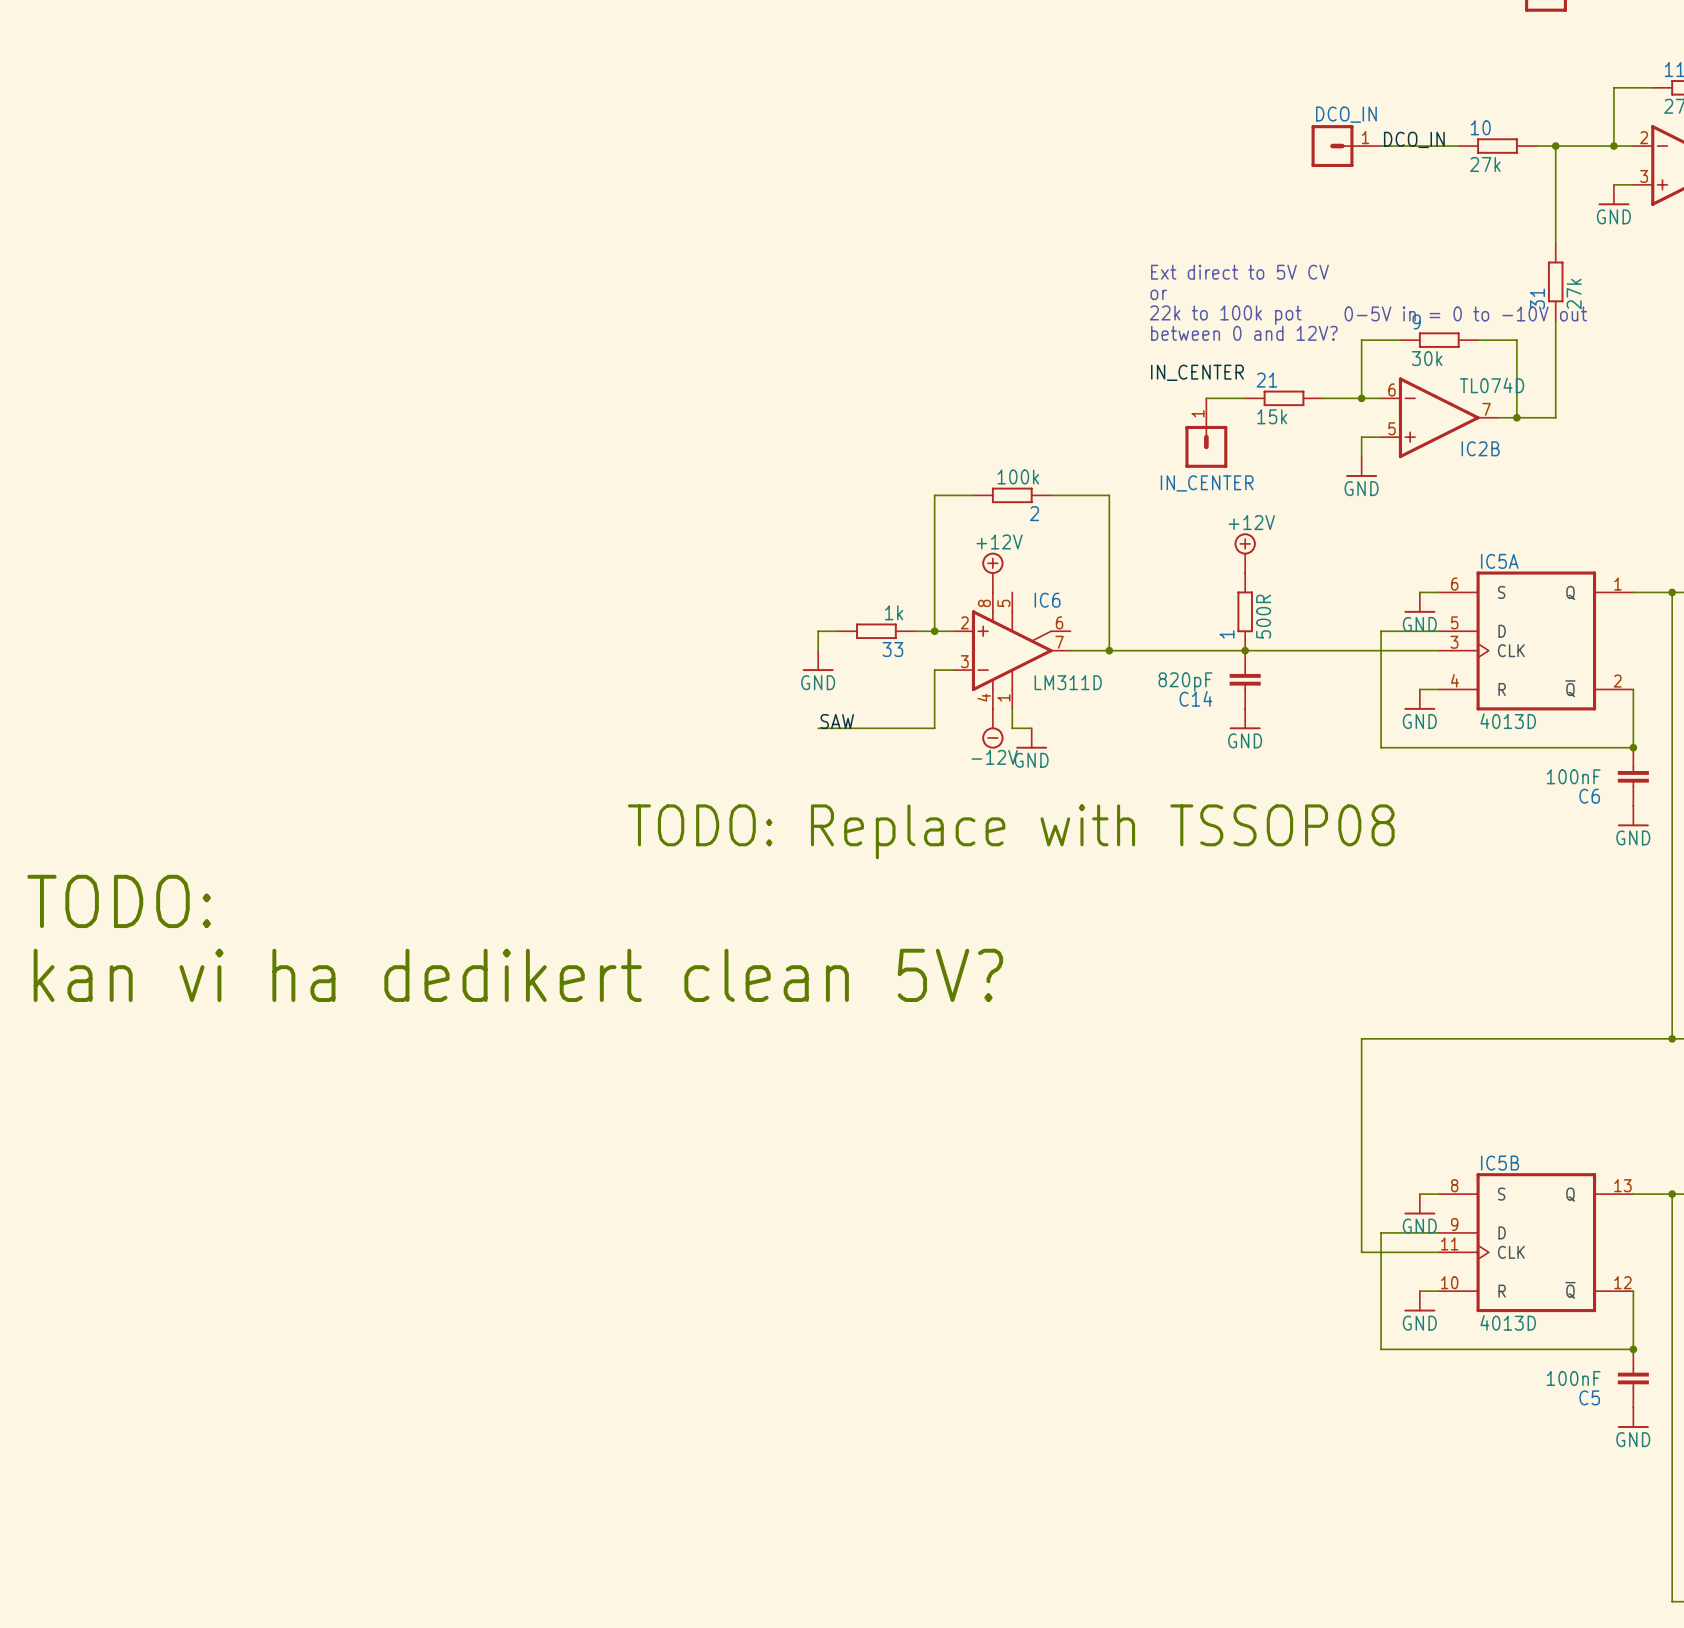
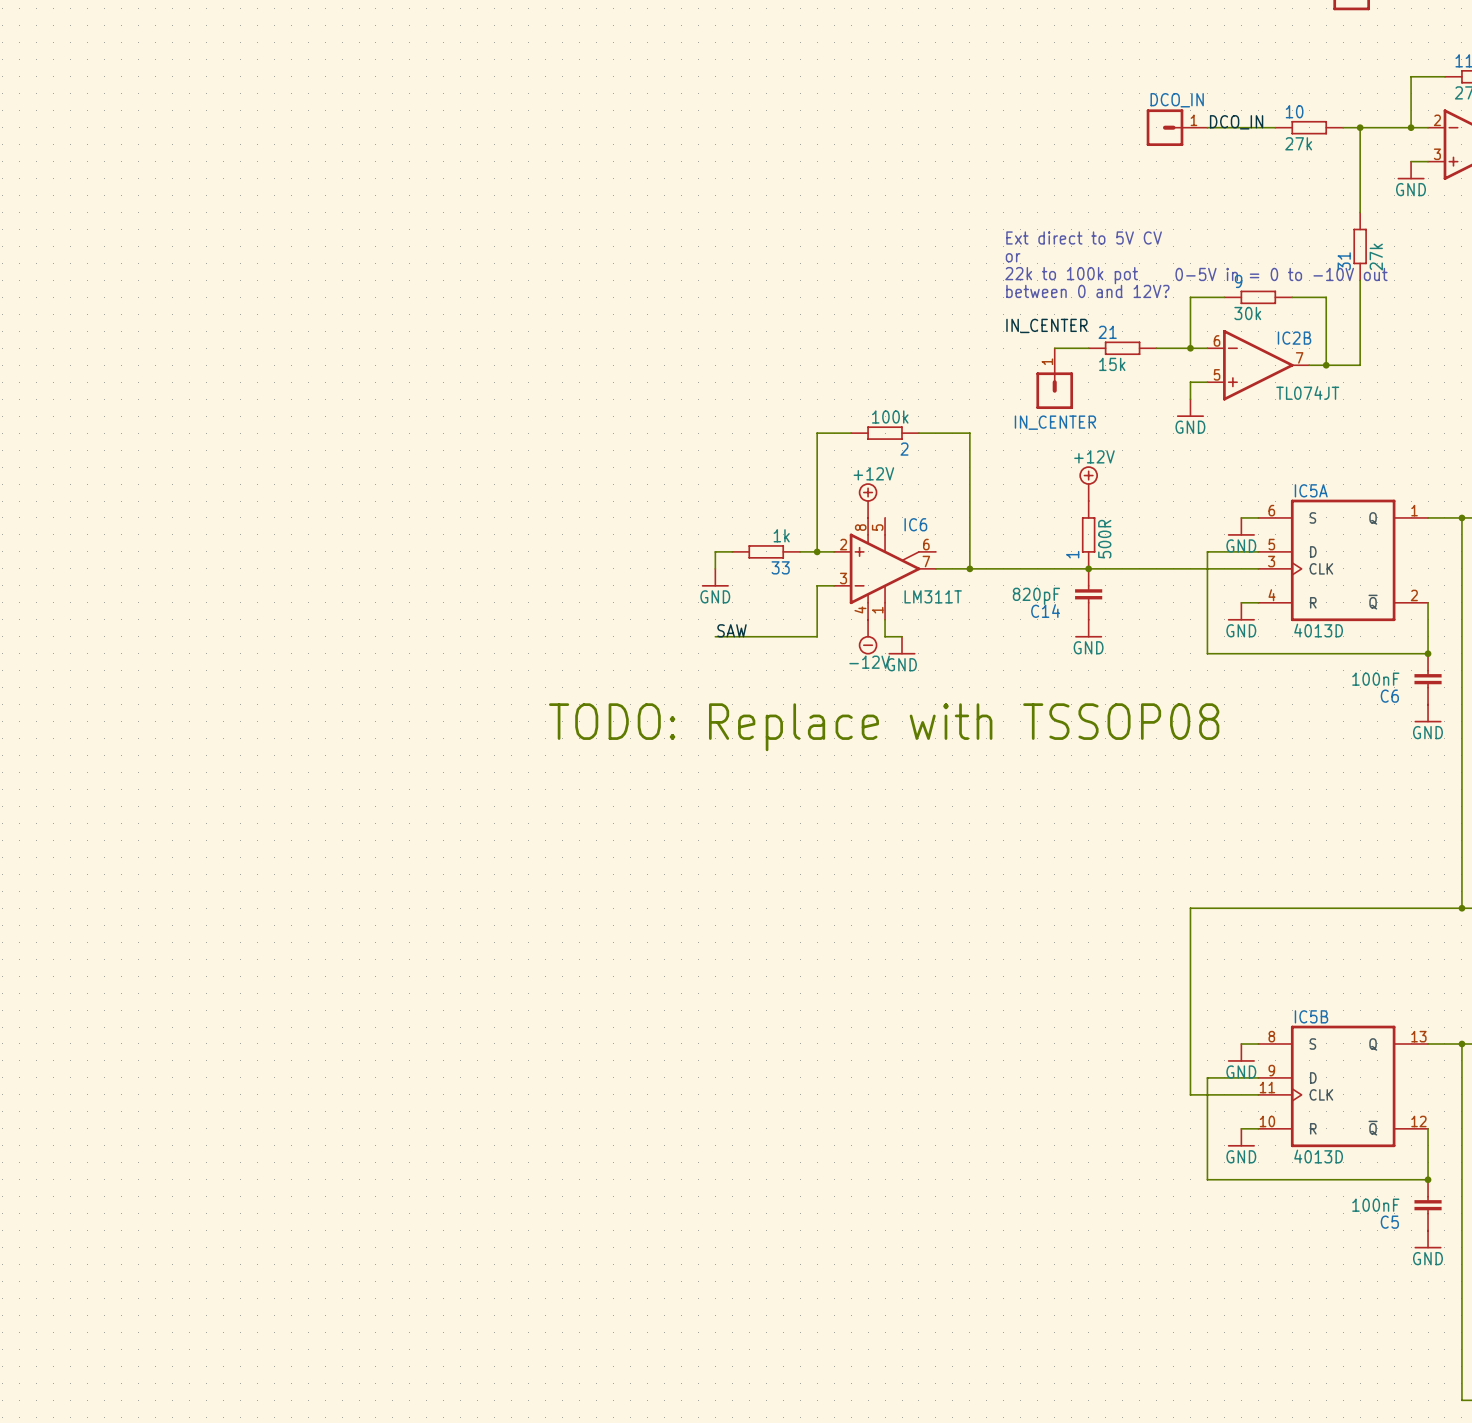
IC2B value: TL074D (1492, 385) -> TL074JT (1307, 392)
IC2B name position: IC2B (1480, 448) -> IC2B (1294, 338)
IC6 value: LM311D (1068, 682) -> LM311T (933, 596)
text: TODO: (119, 901) -> none
text: kan vi ha dedikert clean 5V? (518, 975) -> none

